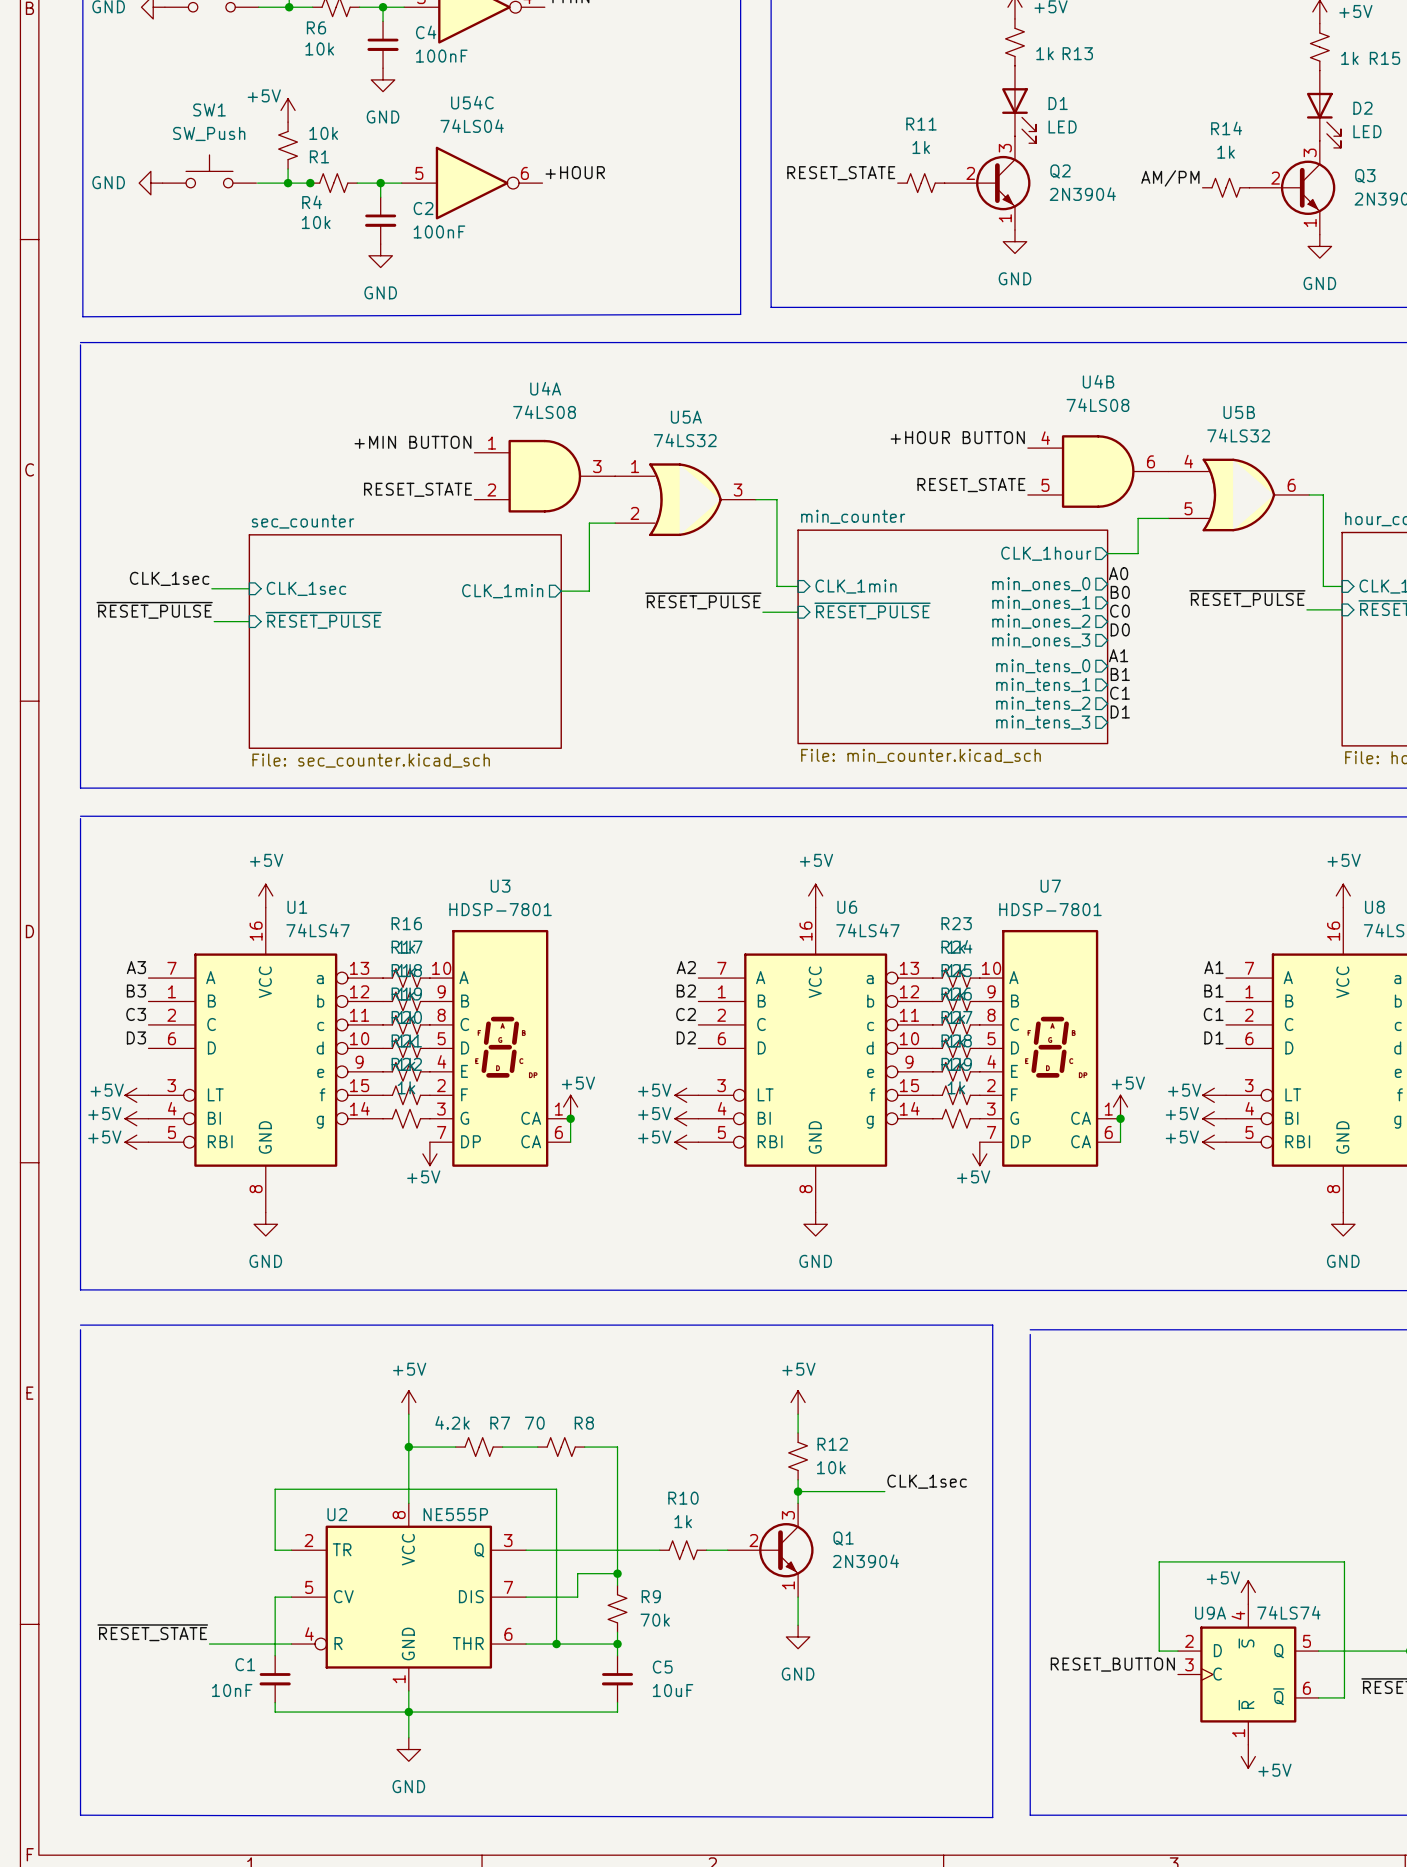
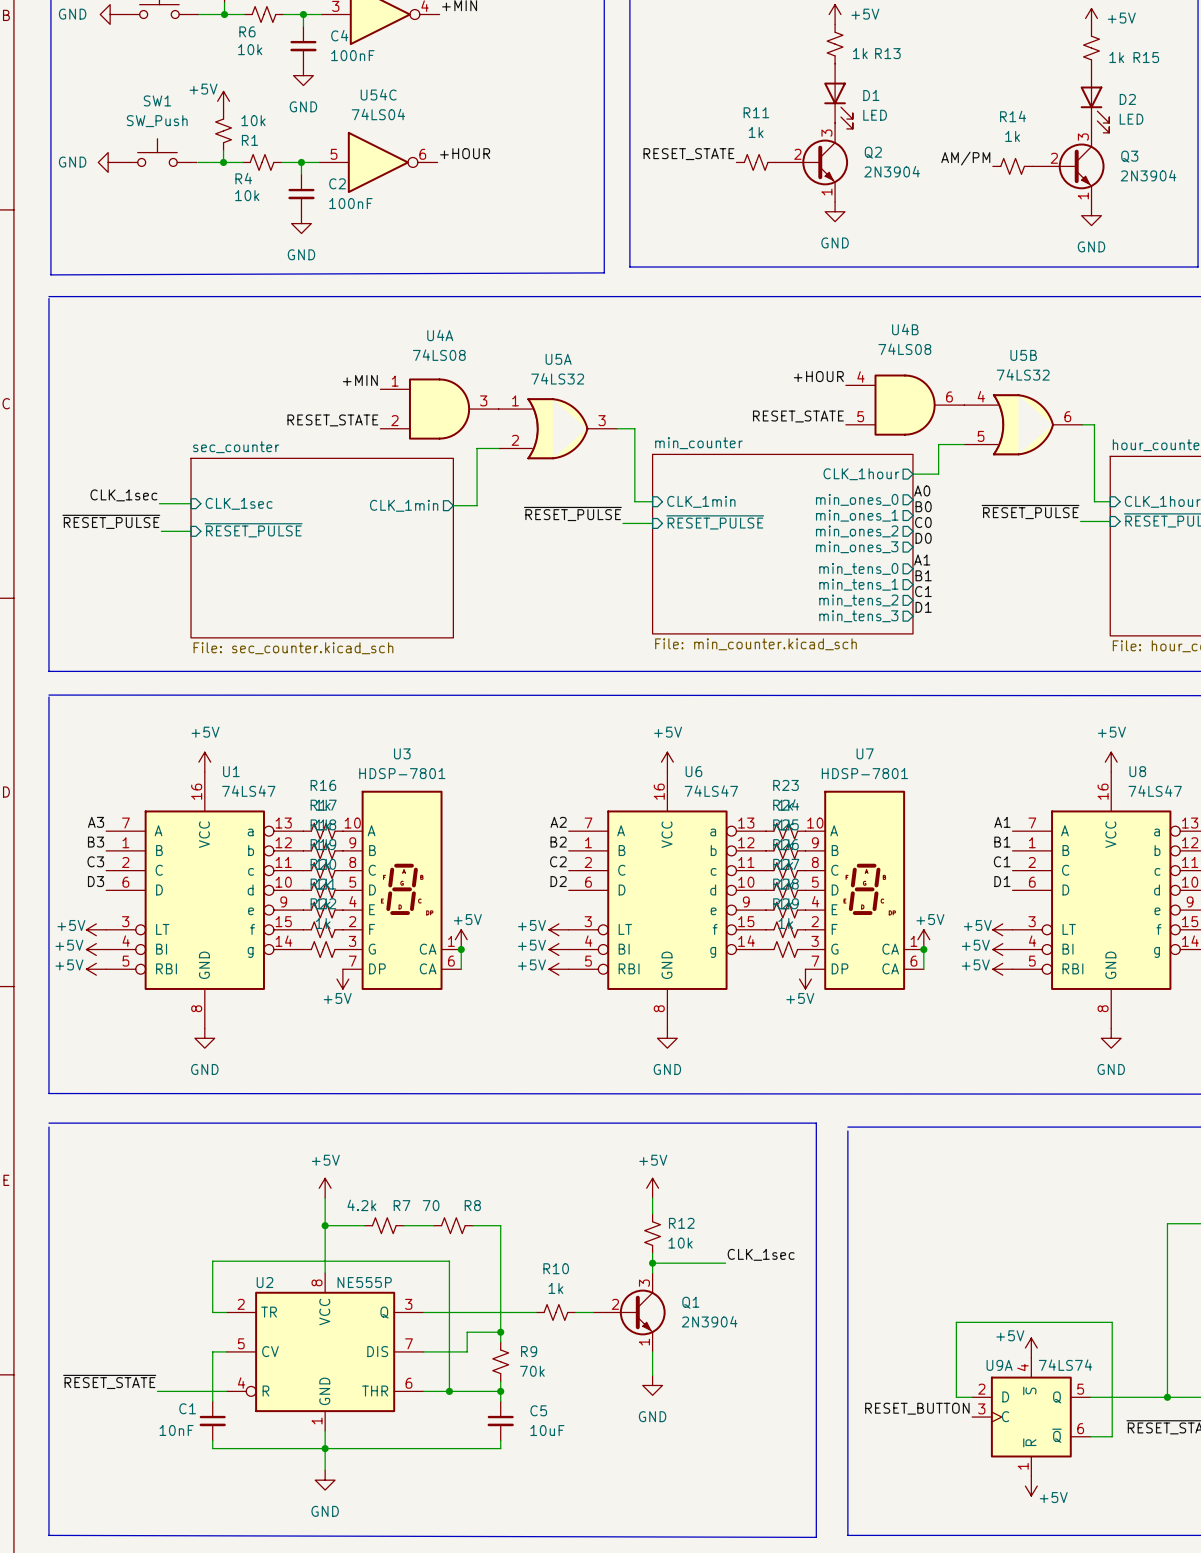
junction: (310, 183) -> none
label: +HOUR BUTTON (957, 437) -> +HOUR (818, 376)
label: +MIN BUTTON (412, 442) -> +MIN (360, 380)

